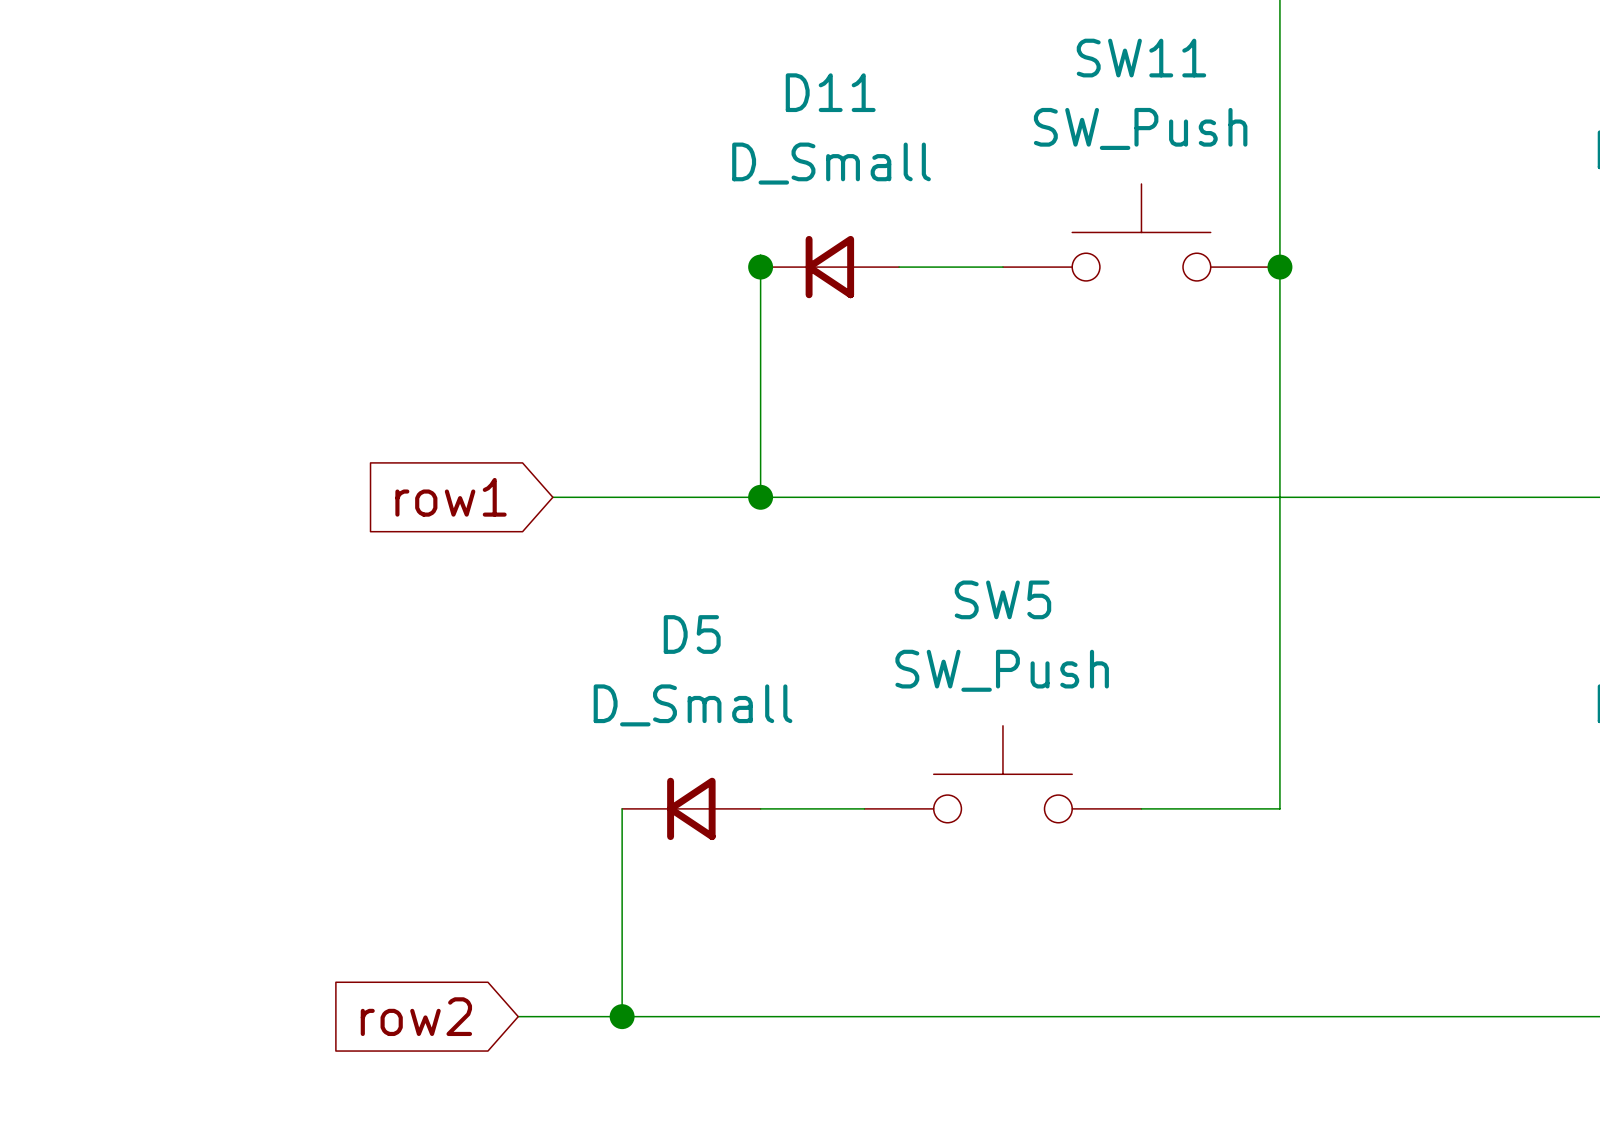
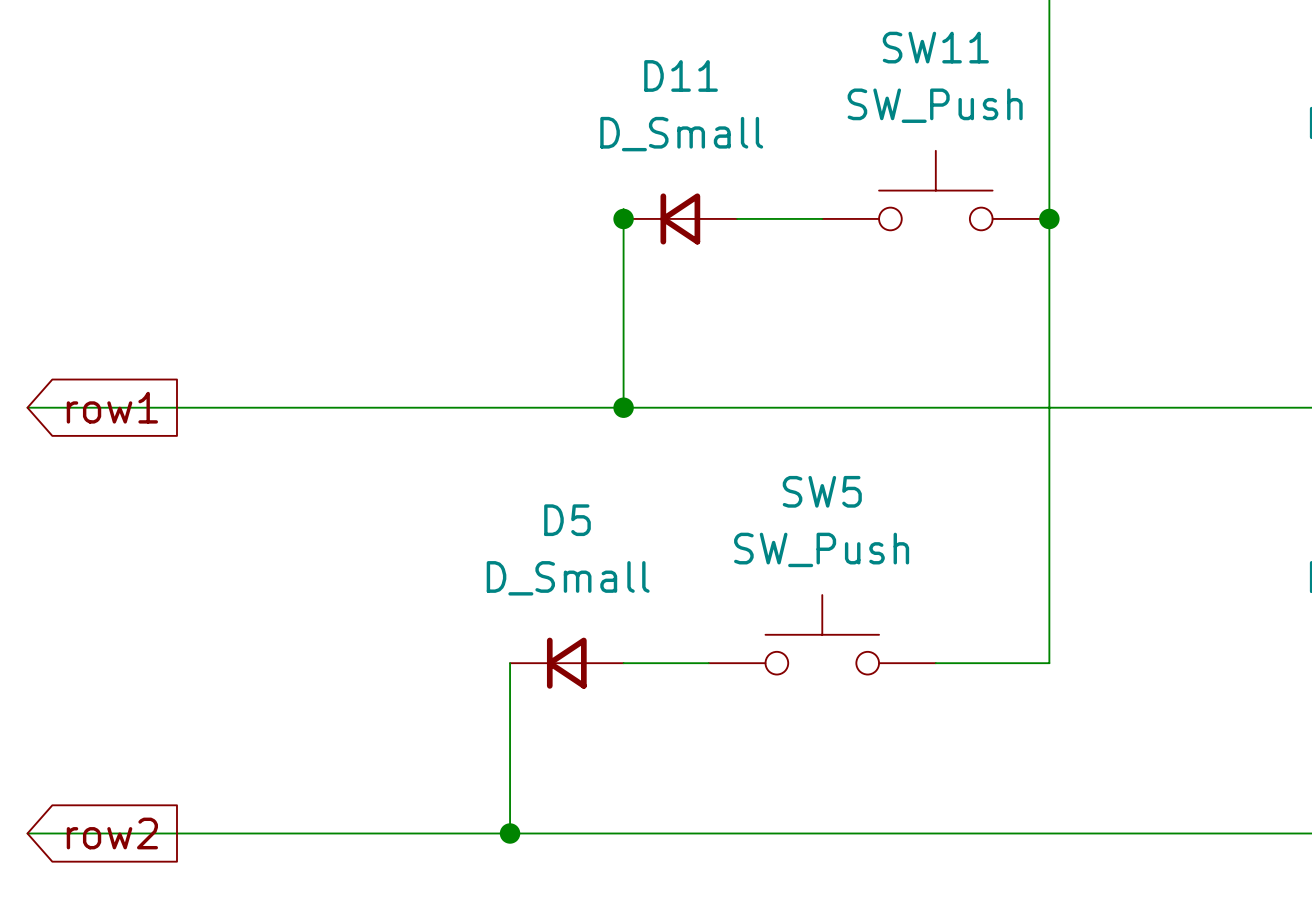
wire: none -> (27, 407) (453, 407)
global label rotation: 0° (451, 497) -> 180° (112, 407)
global label position: row1 (451, 497) -> row1 (112, 407)
wire: none -> (27, 833) (424, 833)
global label rotation: 0° (416, 1016) -> 180° (112, 833)
global label position: row2 (416, 1016) -> row2 (112, 833)

